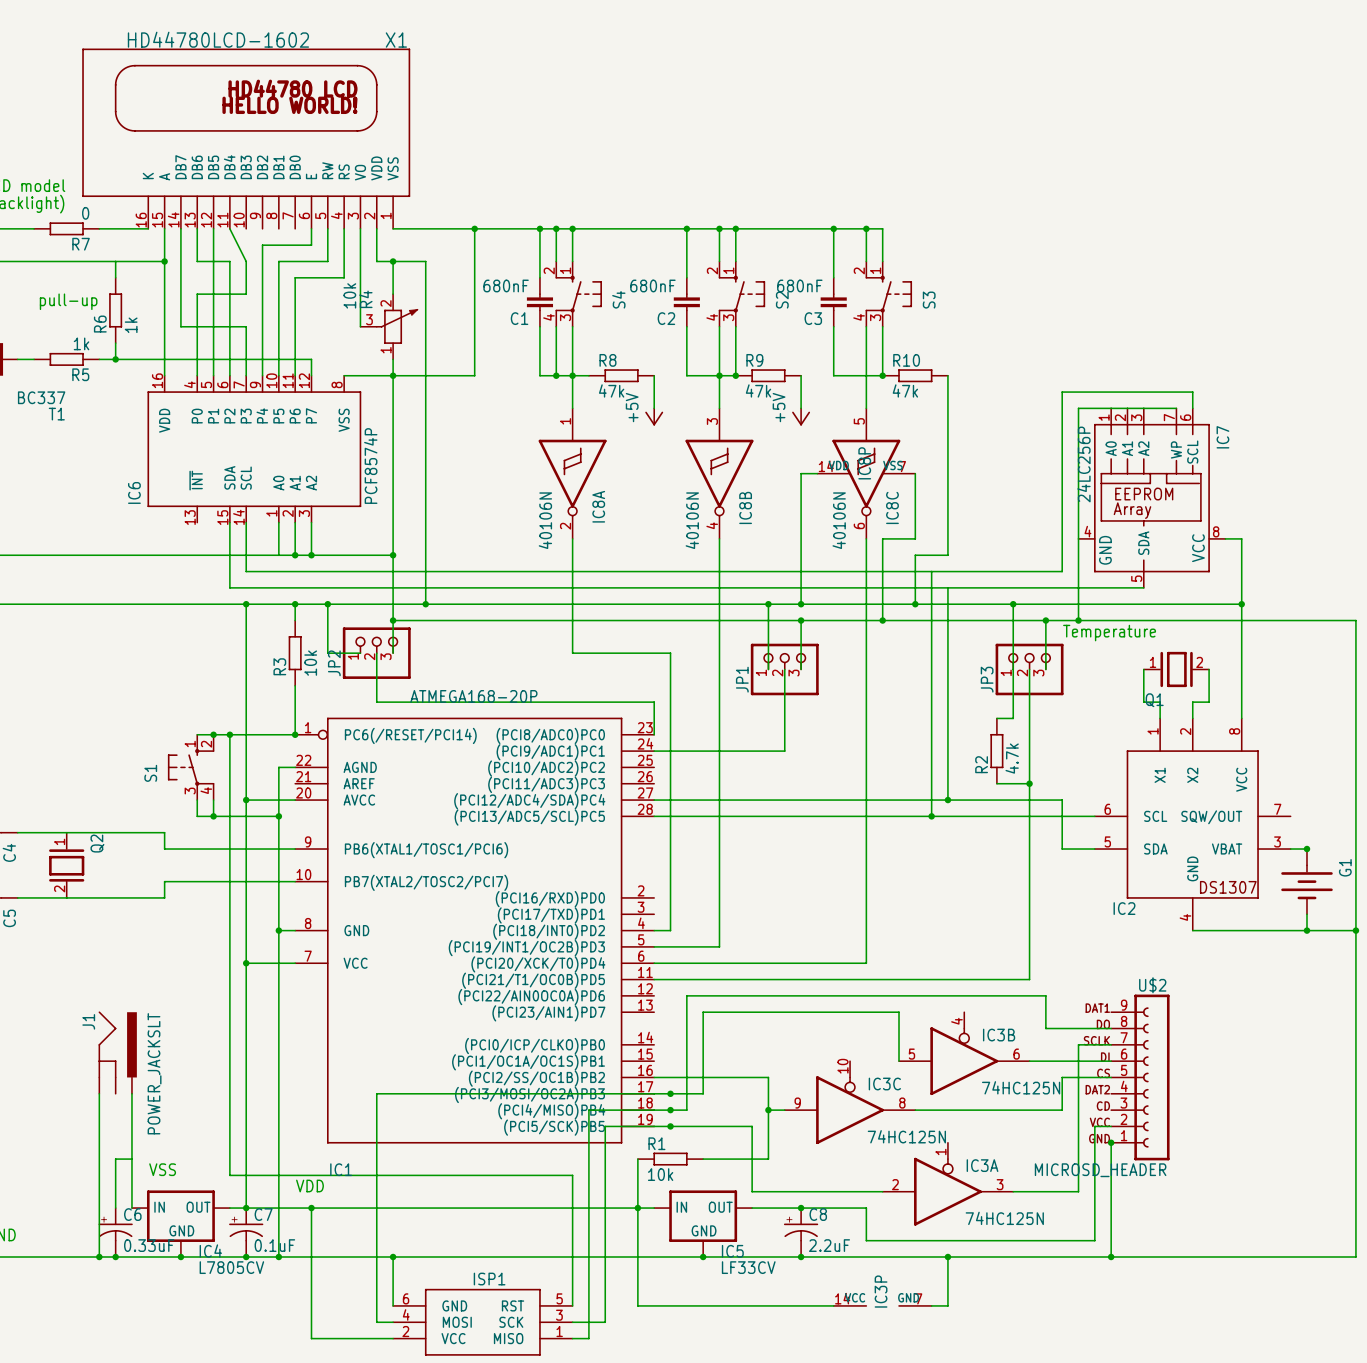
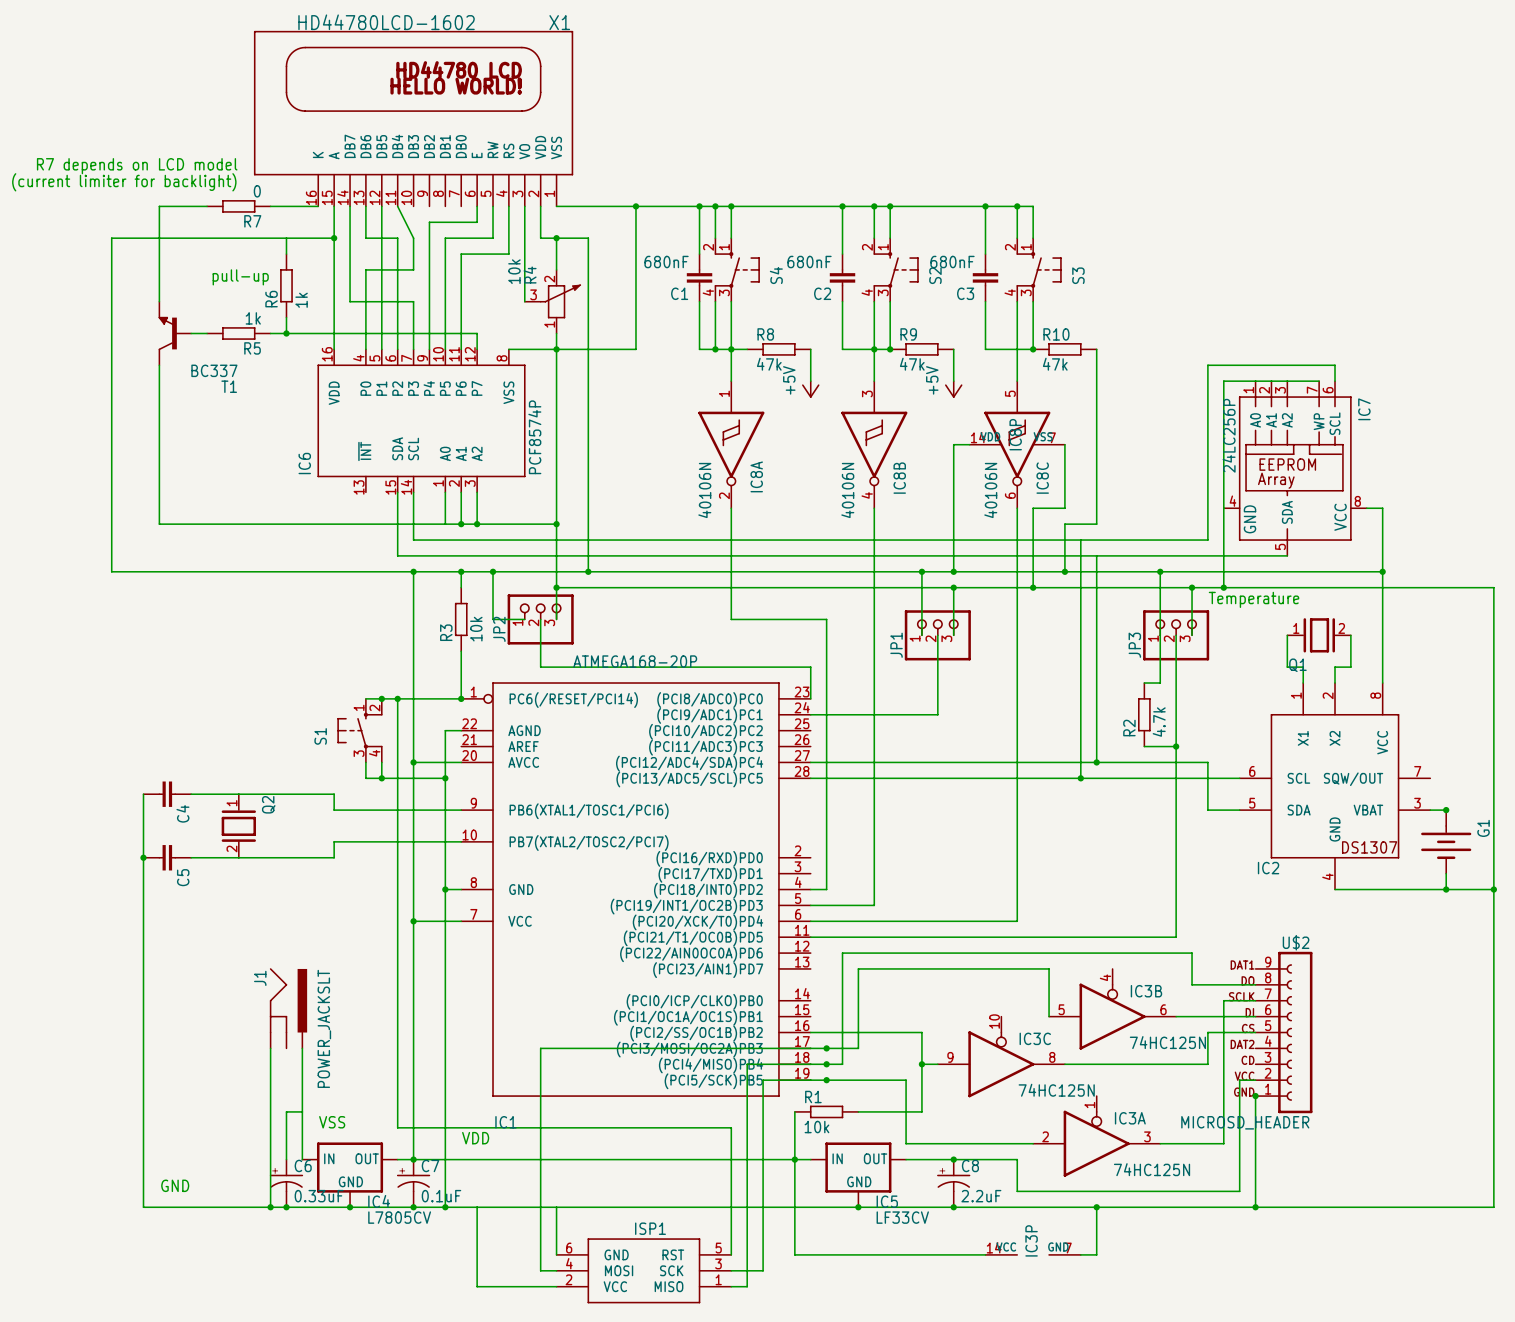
wire: (311, 1208) (311, 1257) -> none
junction: (311, 1208) -> none
junction: (393, 1257) -> none

